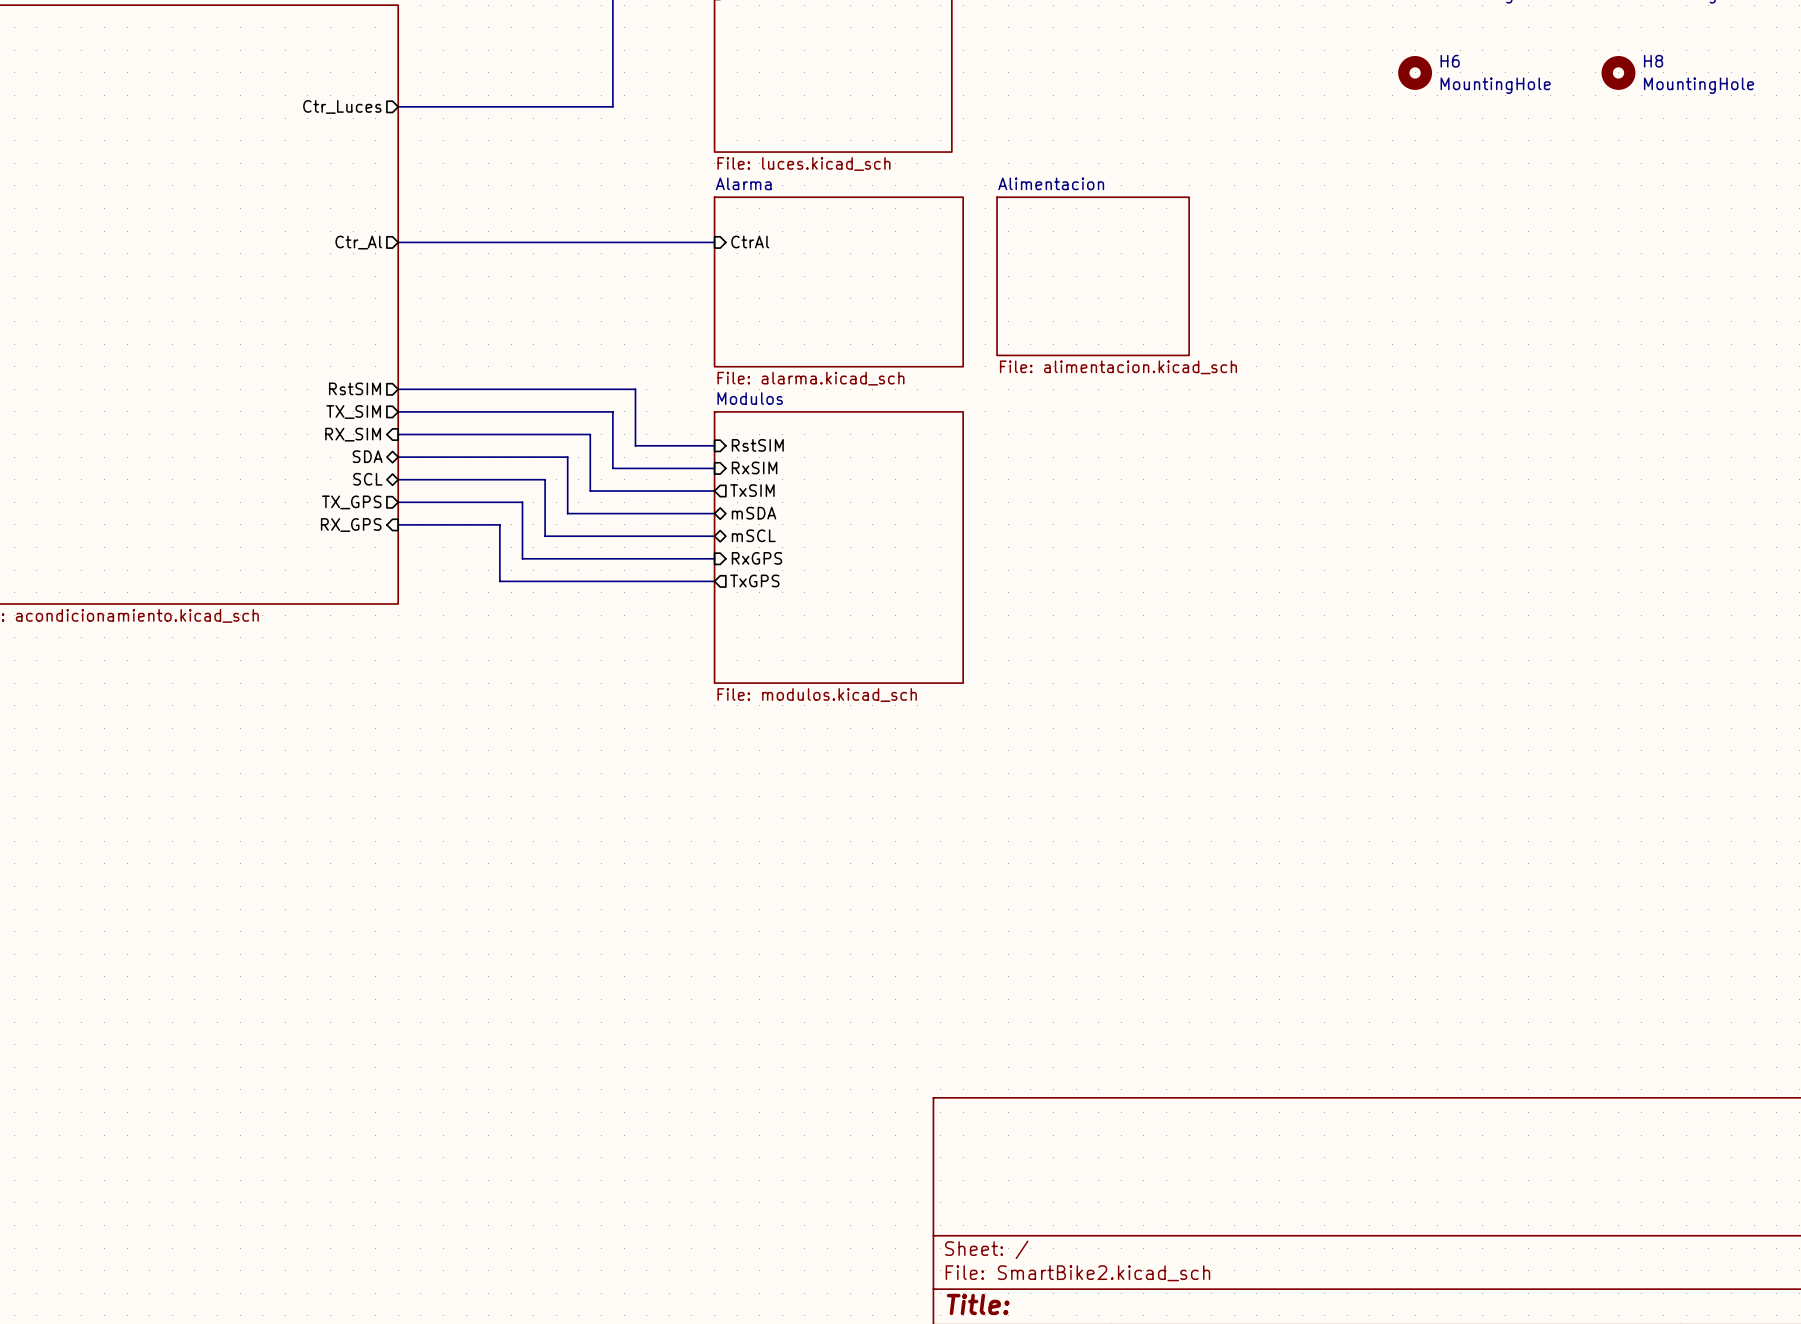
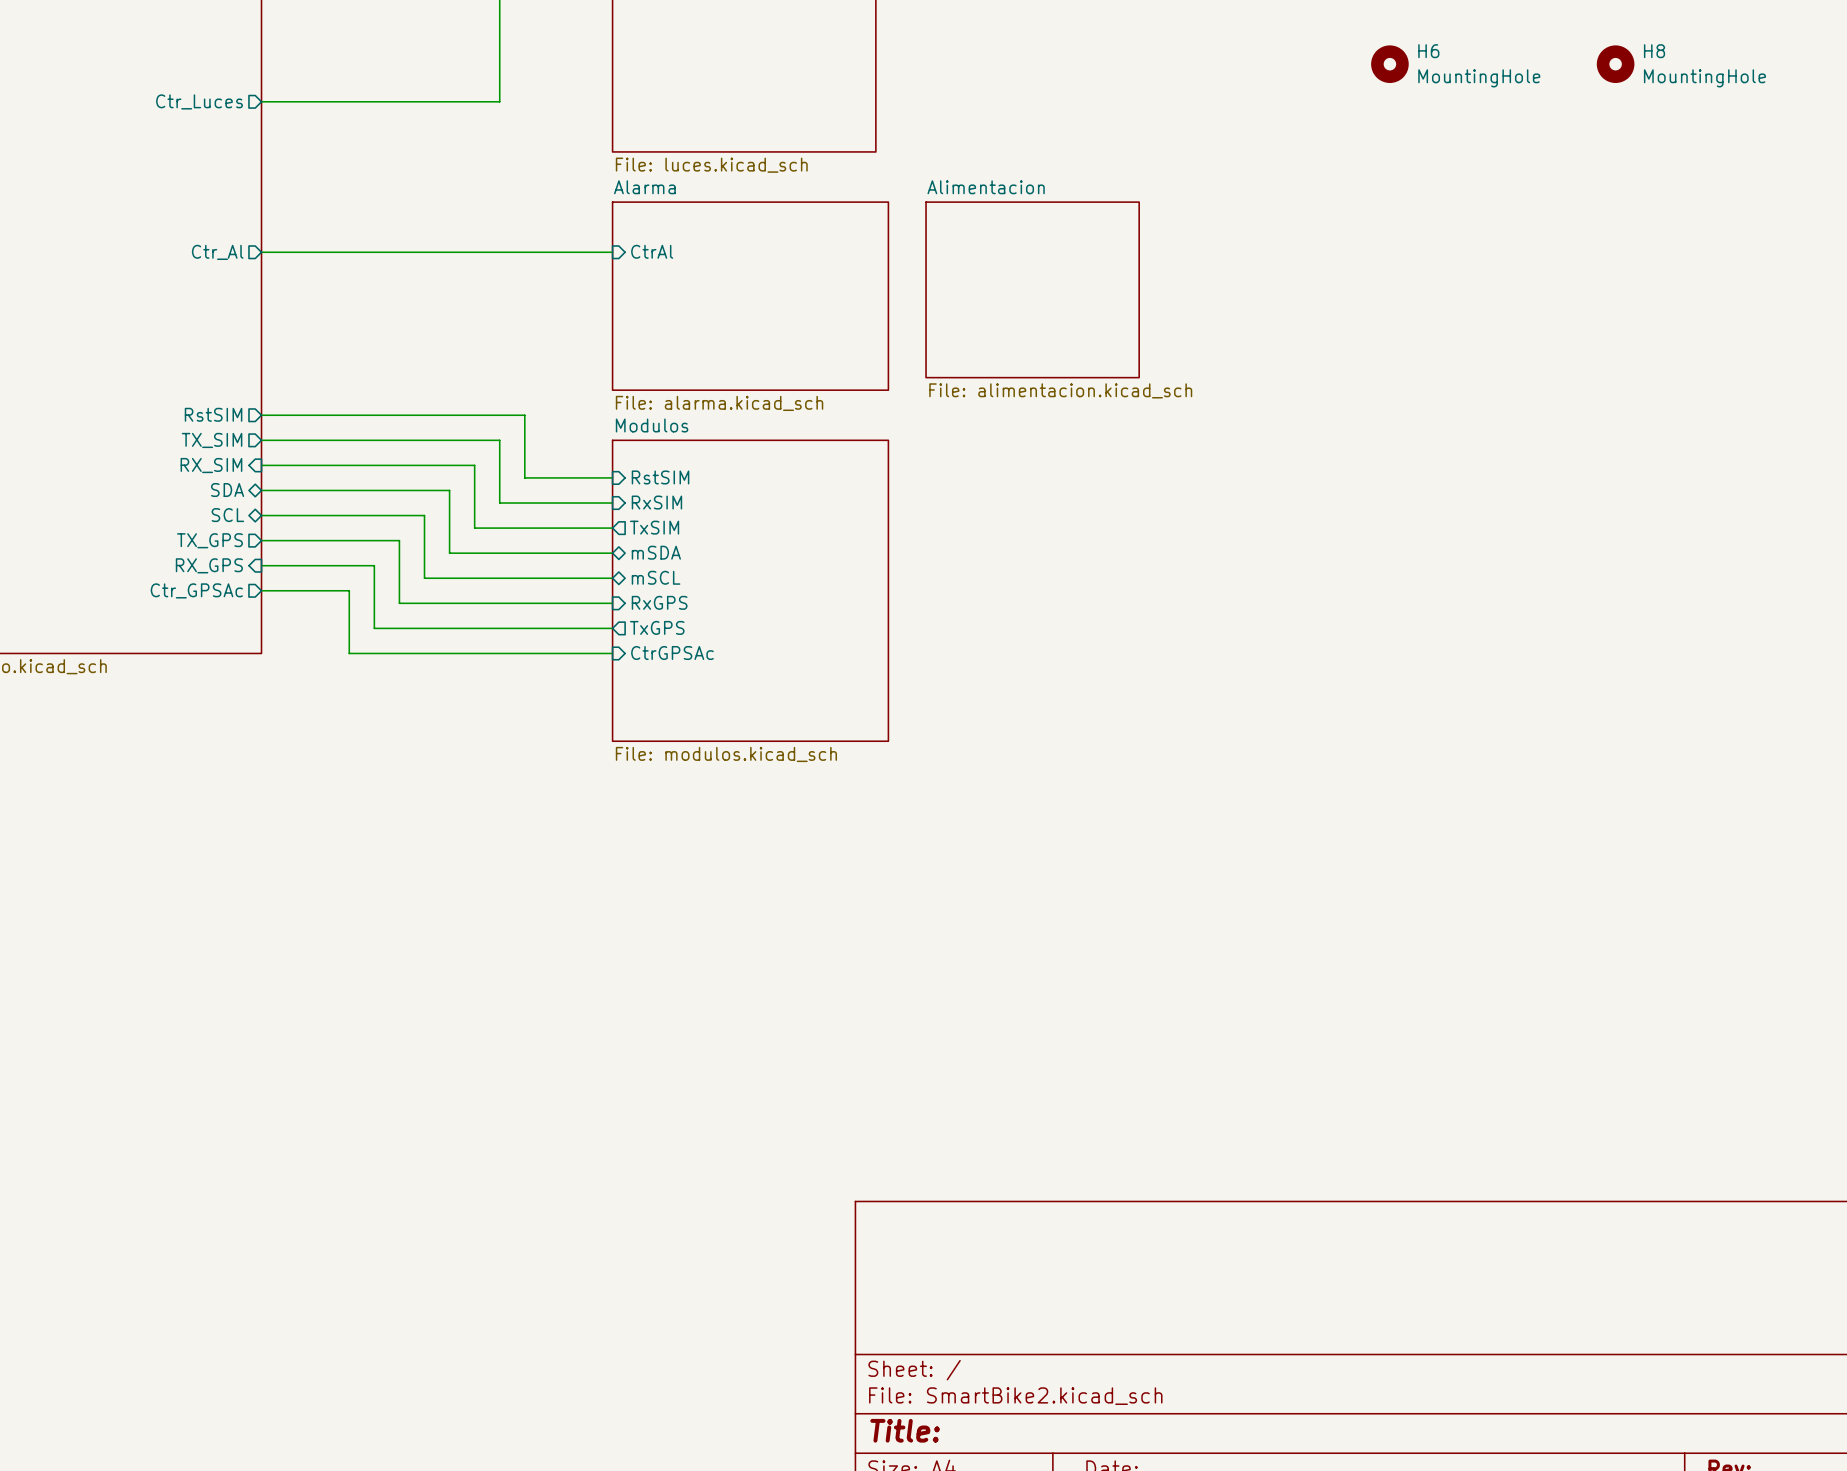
sheet pin: none -> Ctr_GPSAc (196, 590)
wire: none -> (261, 590) (349, 590) (349, 653) (612, 653)
sheet pin: none -> CtrGPSAc (672, 653)

